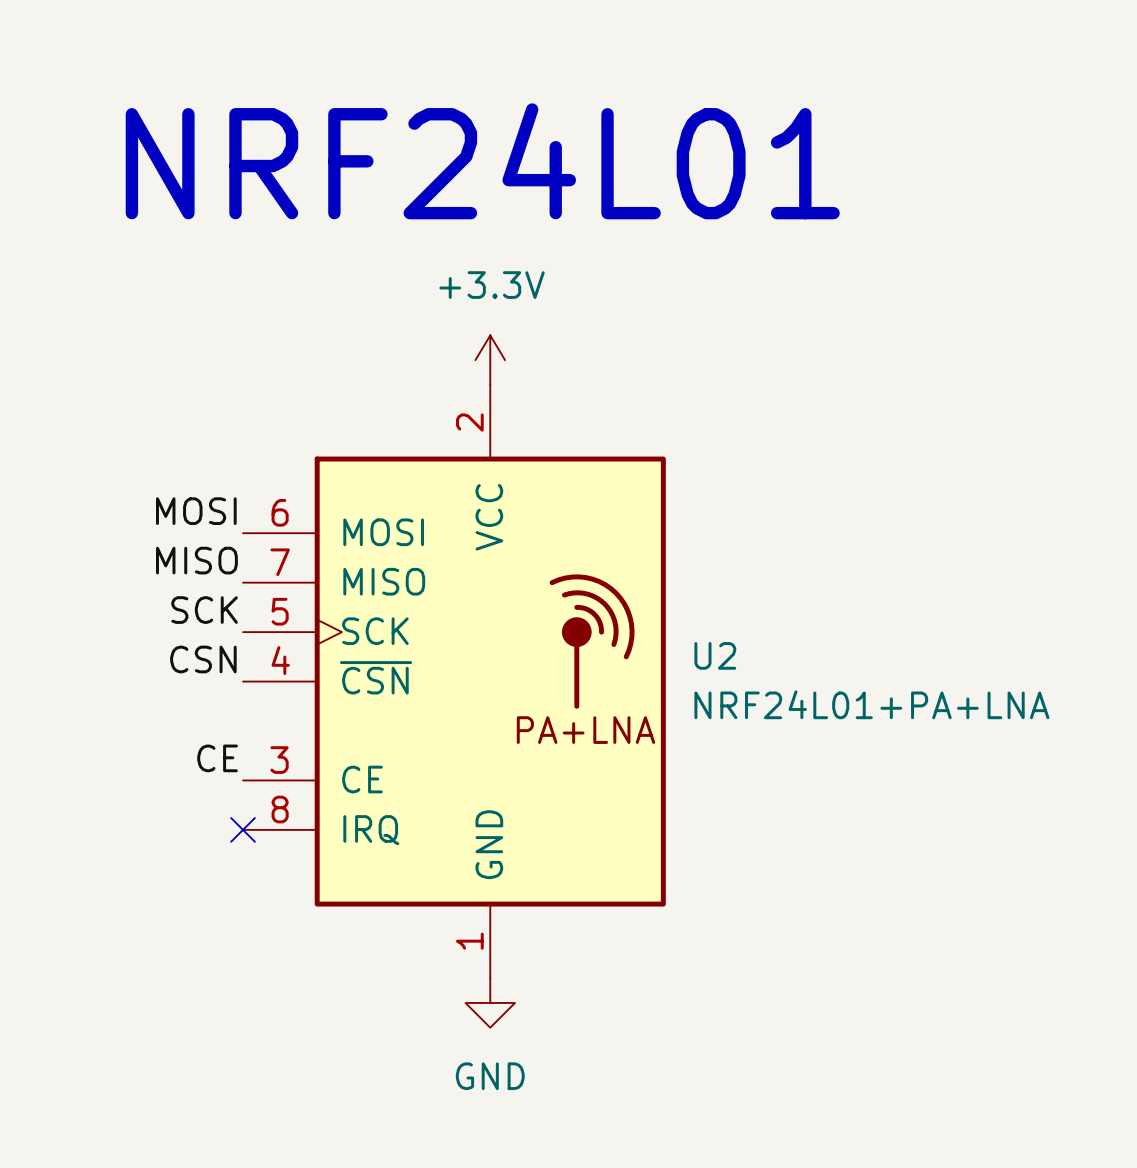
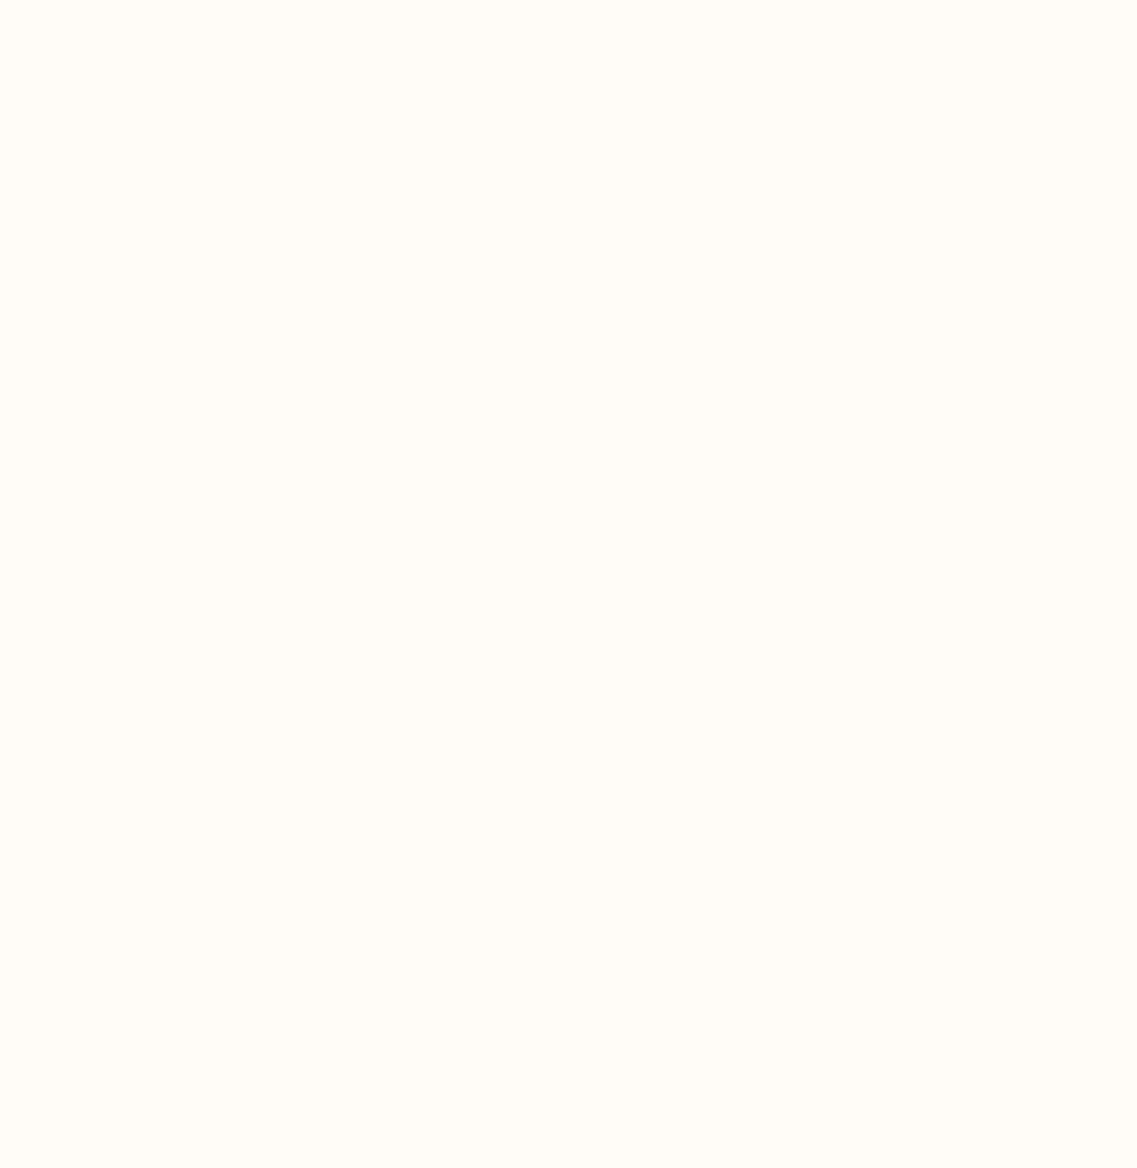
text: NRF24L01 (482, 161) -> none
power symbol: +3.3V (490, 360) -> none
label: MOSI (196, 511) -> none
label: MISO (196, 560) -> none
label: SCK (204, 610) -> none
label: CSN (203, 659) -> none
U2: NRF24L01+PA+LNA (454, 681) -> none
label: CE (217, 758) -> none
no-connect mark: (243, 829) -> none
power symbol: GND (490, 1002) -> none

